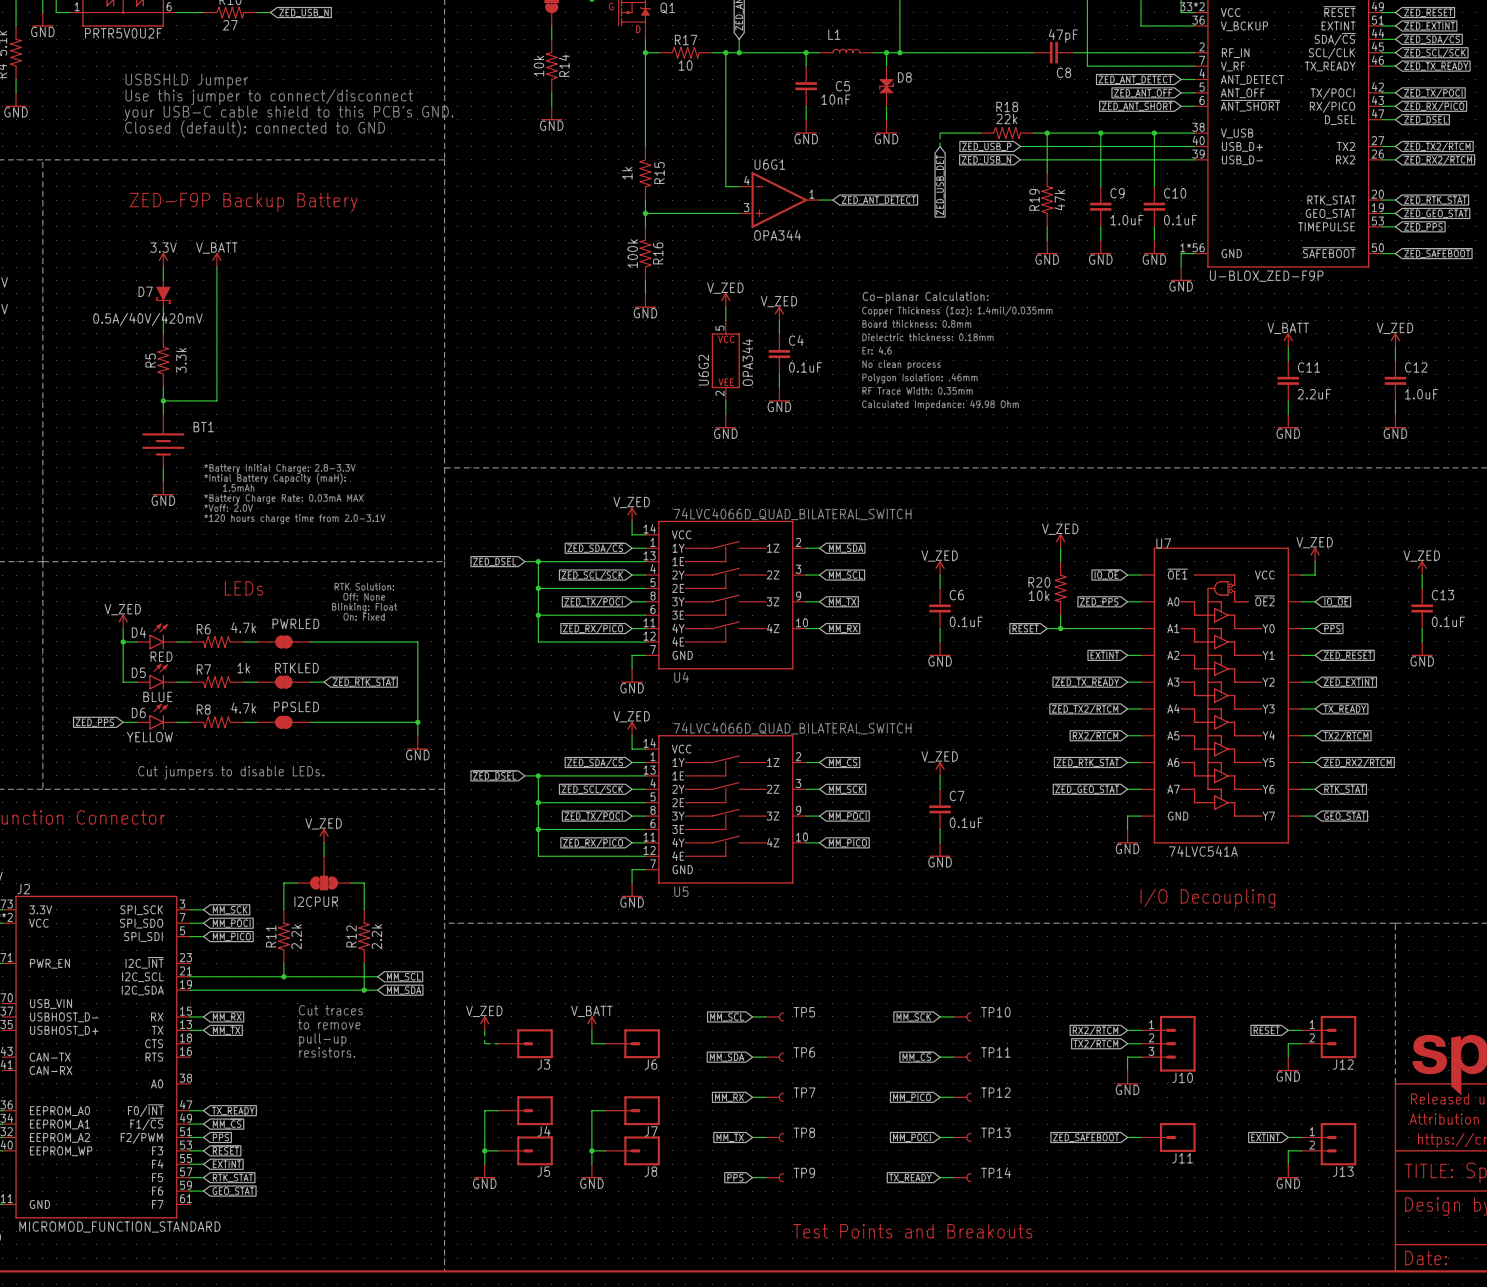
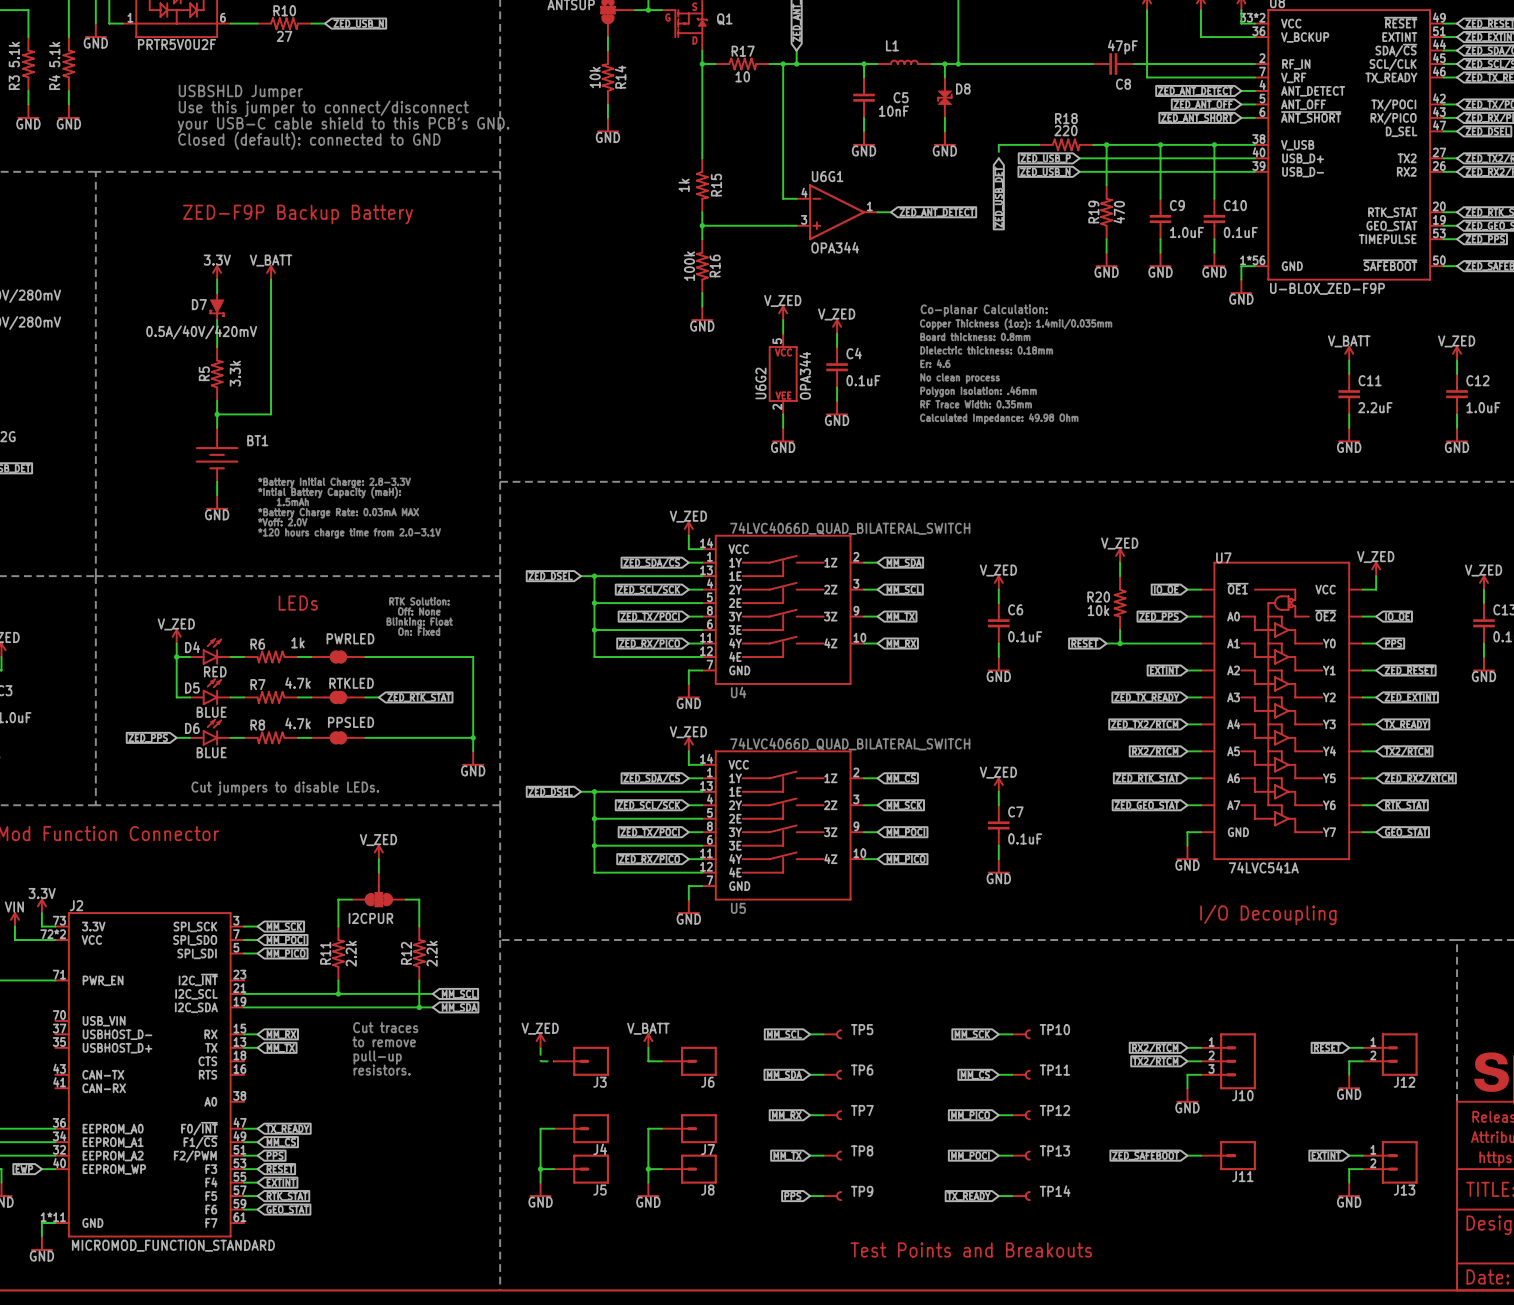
R18 value: 22k (1006, 119) -> 220 (1065, 130)
R19 value: 47k (1059, 200) -> 470 (1119, 212)
R6 value: 4.7k (243, 627) -> 1k (297, 642)
R7 value: 1k (243, 668) -> 4.7k (297, 683)
D6 value: YELLOW (149, 737) -> BLUE (211, 752)

